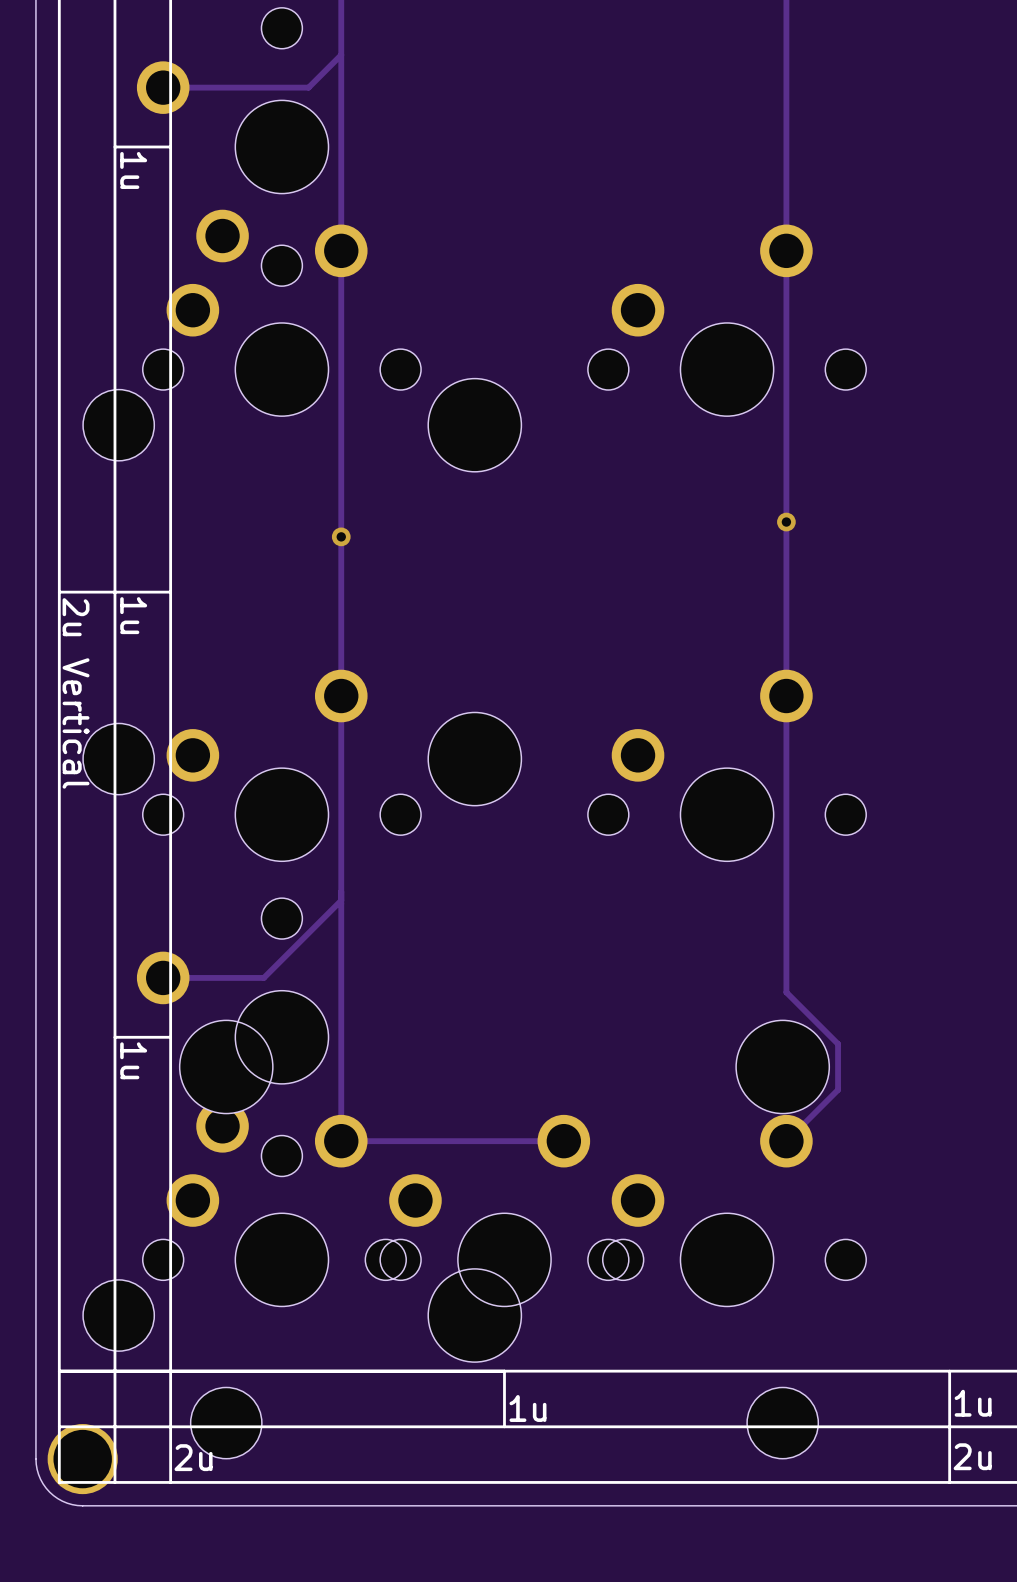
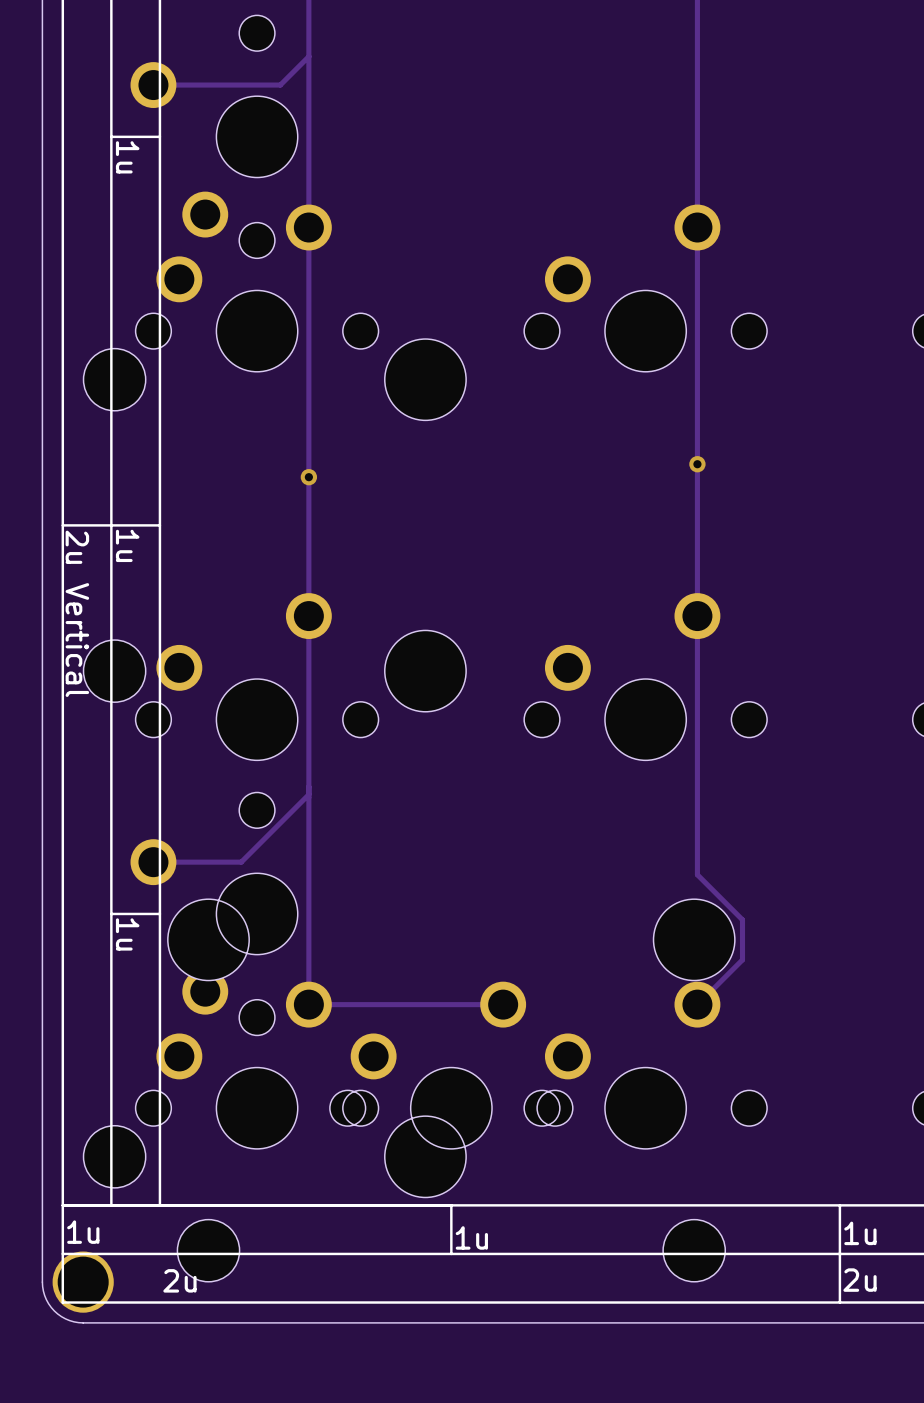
line: (114, 1371) (114, 1482) -> none
line: (170, 1371) (170, 1482) -> none
text: none -> 1u (83, 1232)

